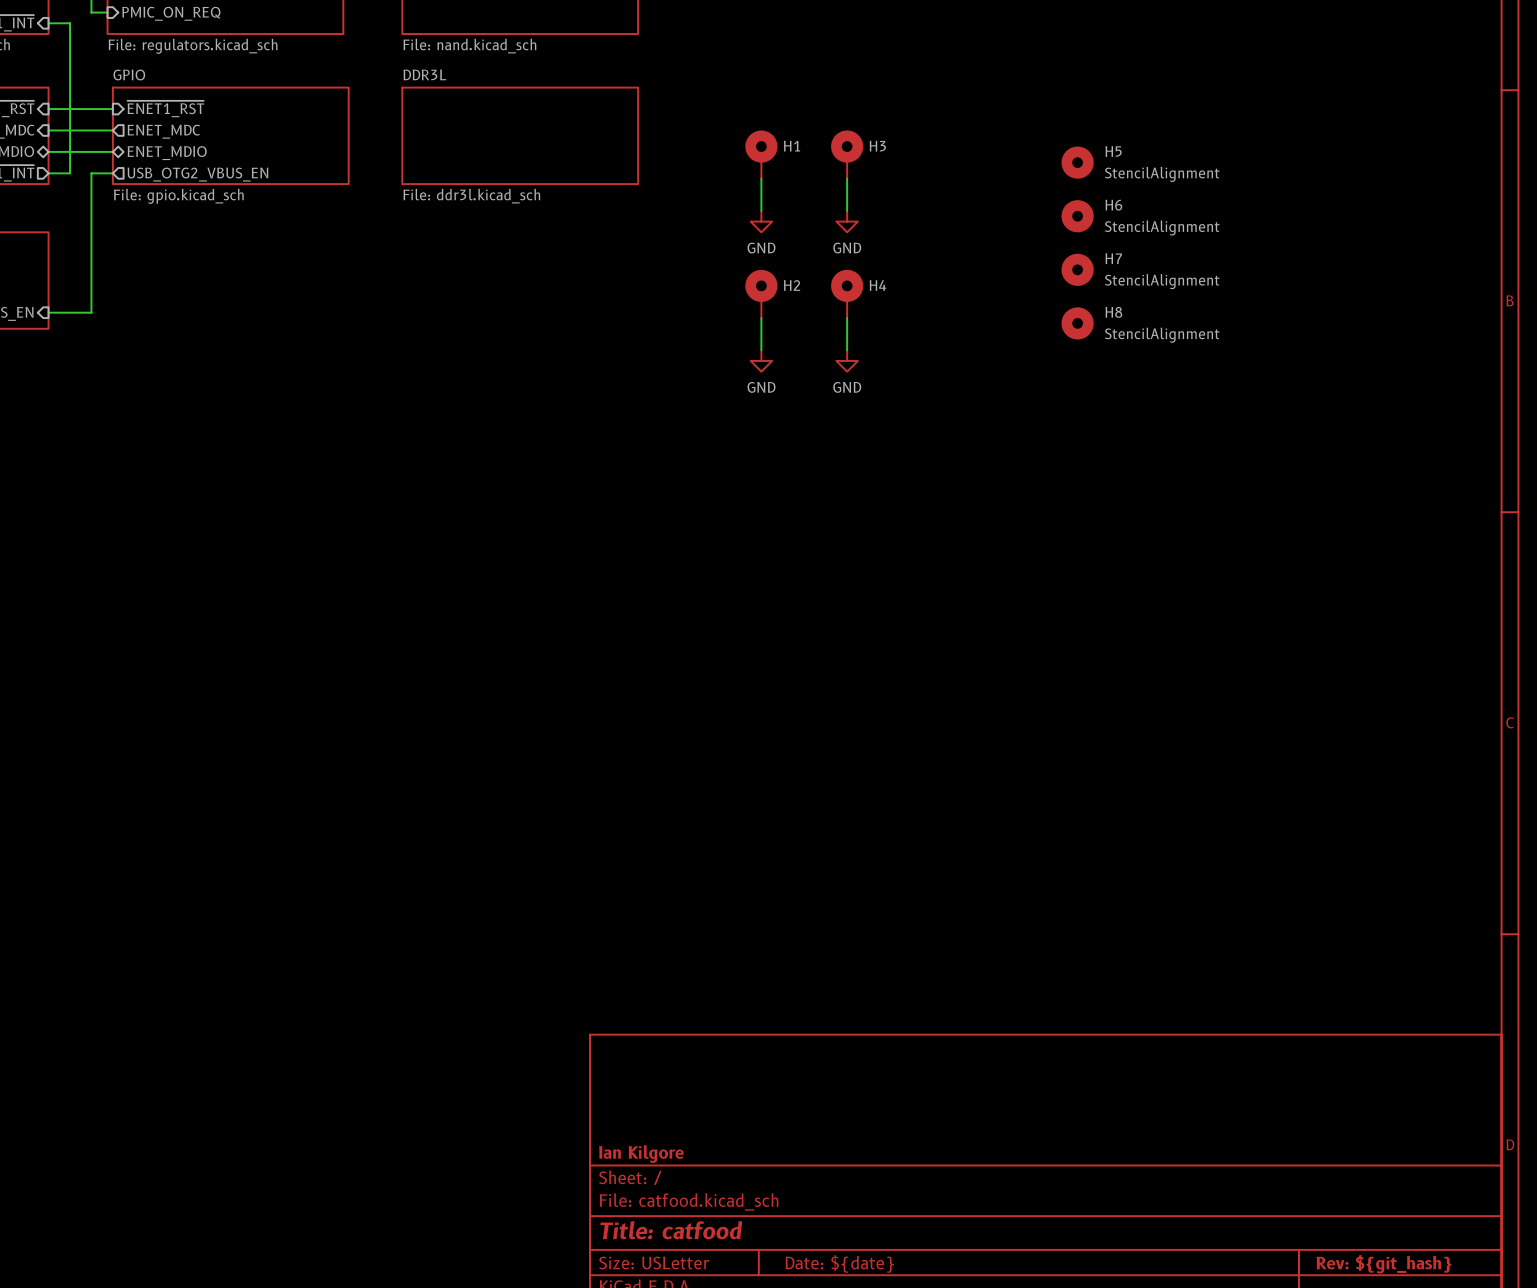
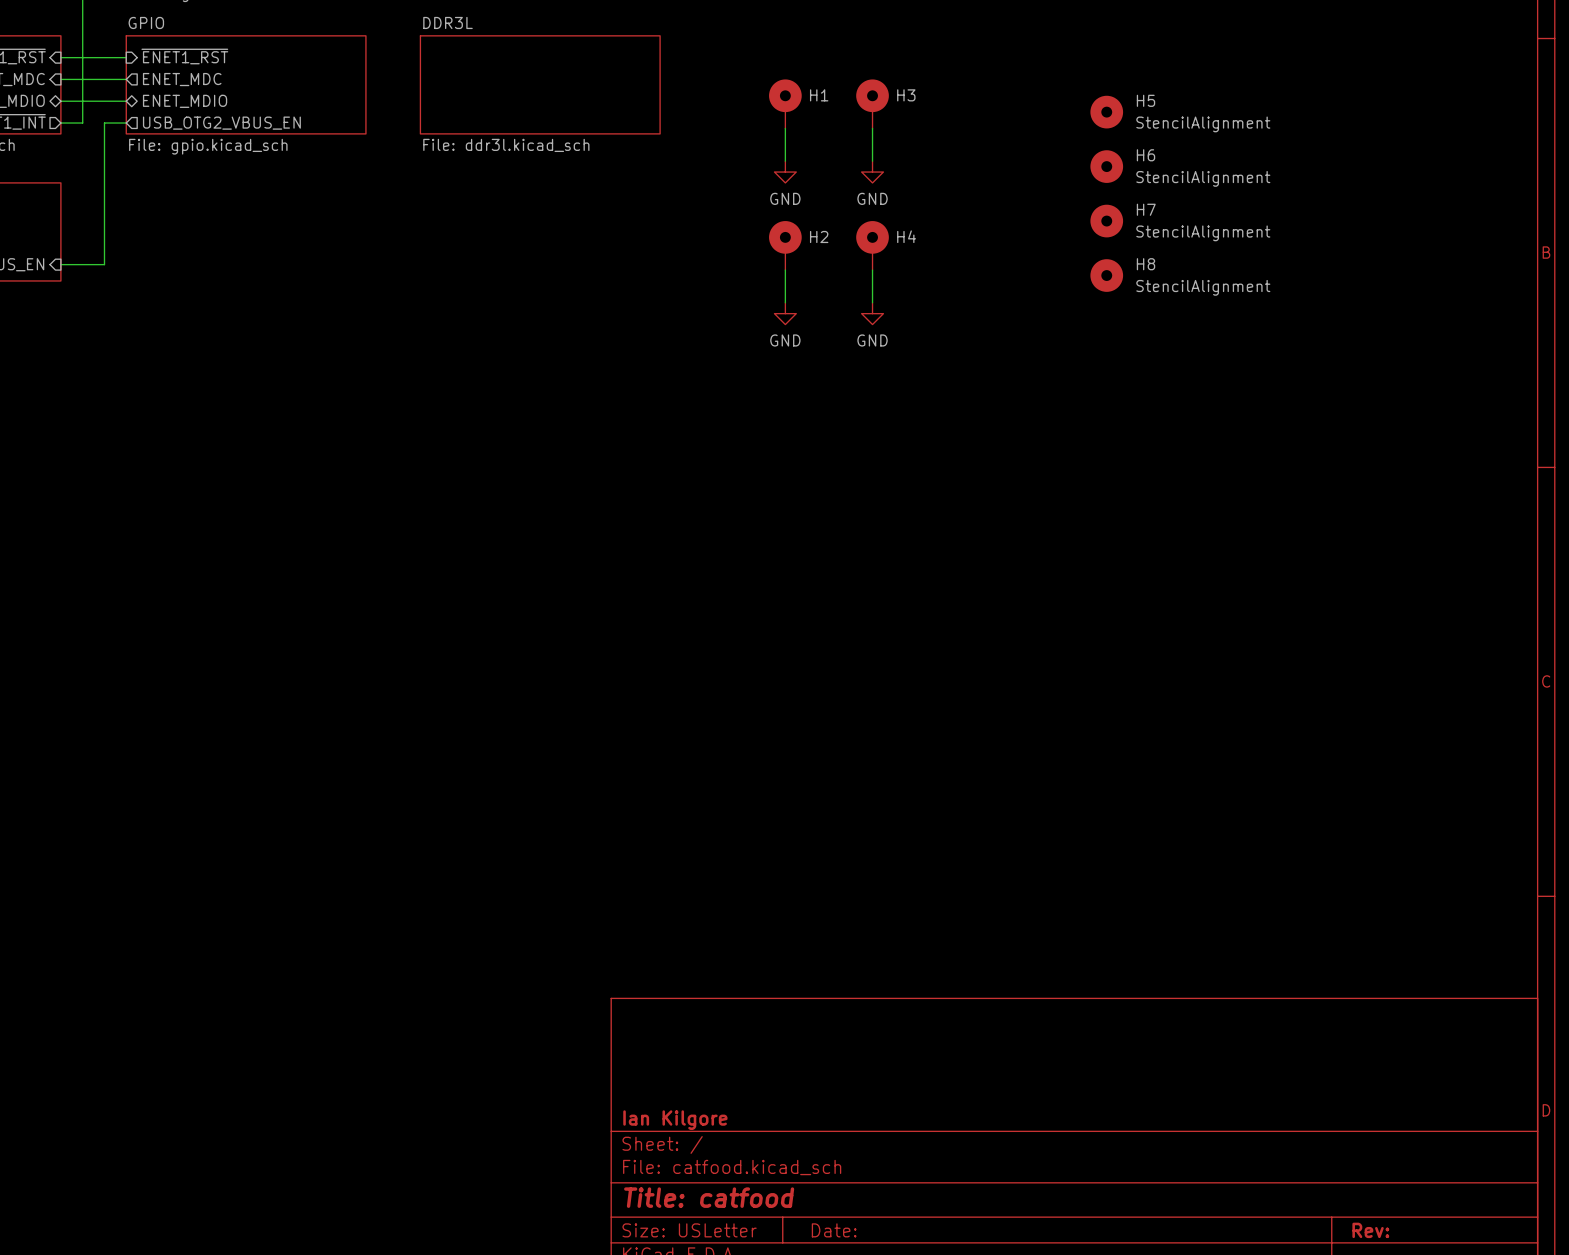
title block: Date: ${date} (839, 1263) -> Date: (834, 1230)
title block: Rev: ${git_hash} (1383, 1264) -> Rev: (1370, 1230)

